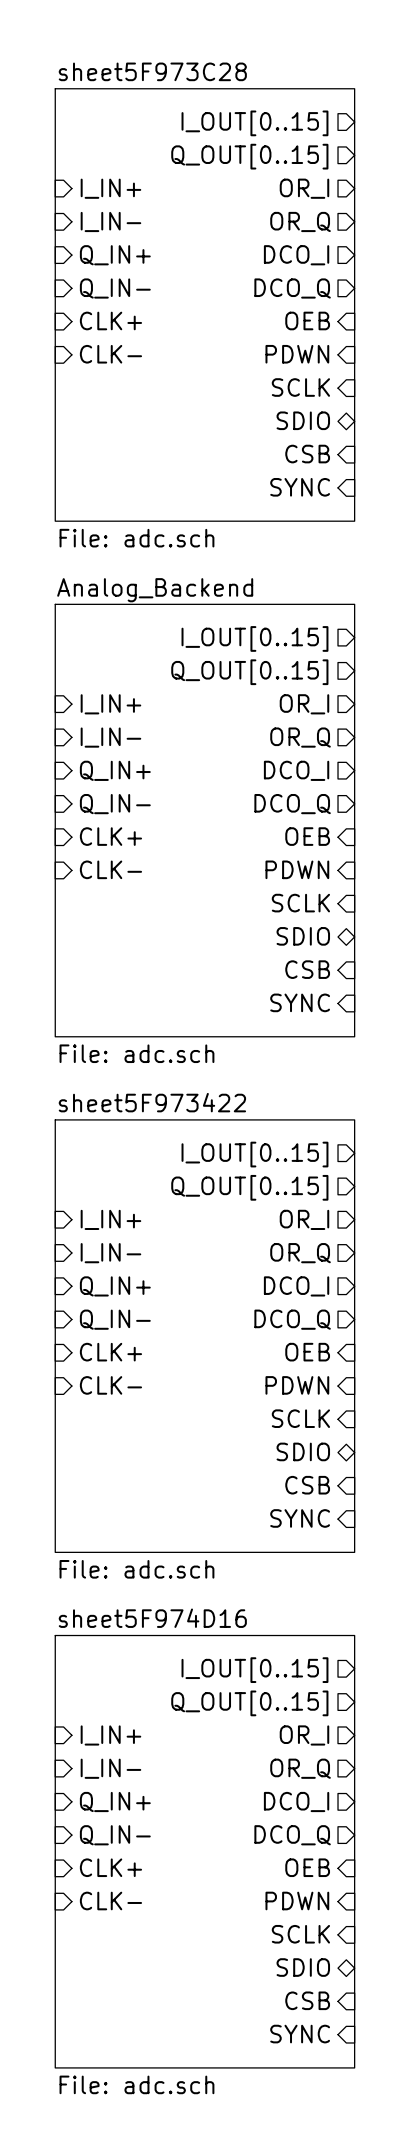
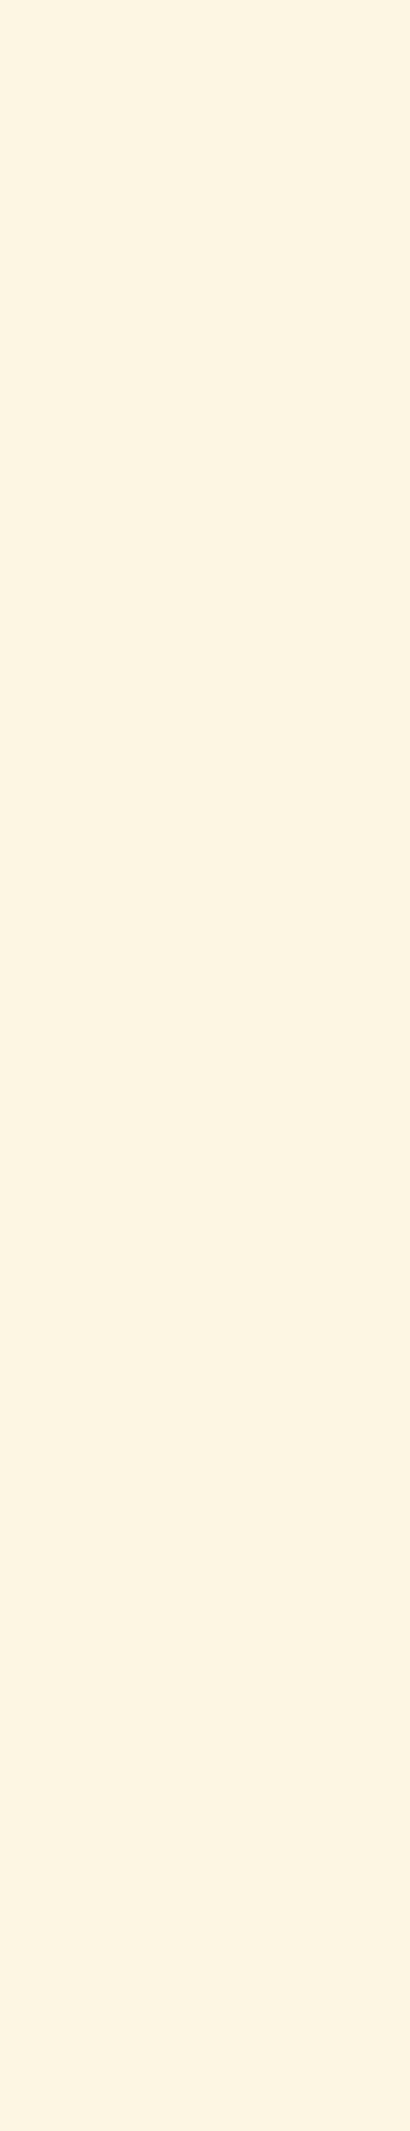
sheet pin: I_OUT[0..15] (254, 123) -> none
sheet pin: Q_OUT[0..15] (249, 156) -> none
sheet pin: I_IN+ (110, 188) -> none
sheet pin: OR_I (304, 188) -> none
sheet pin: I_IN- (110, 221) -> none
sheet pin: OR_Q (300, 221) -> none
sheet pin: Q_IN+ (115, 255) -> none
sheet pin: DCO_I (296, 255) -> none
sheet pin: Q_IN- (115, 288) -> none
sheet pin: DCO_Q (292, 288) -> none
sheet sheet5F973C28: File: adc.sch (204, 304) -> none
sheet pin: CLK+ (110, 320) -> none
sheet pin: OEB (307, 320) -> none
sheet pin: CLK- (110, 354) -> none
sheet pin: PDWN (297, 354) -> none
sheet pin: SCLK (300, 387) -> none
sheet pin: SDIO (303, 420) -> none
sheet pin: CSB (307, 454) -> none
sheet pin: SYNC (300, 487) -> none
sheet pin: I_OUT[0..15] (254, 638) -> none
sheet pin: Q_OUT[0..15] (249, 672) -> none
sheet pin: I_IN+ (110, 704) -> none
sheet pin: OR_I (304, 704) -> none
sheet pin: I_IN- (110, 737) -> none
sheet pin: OR_Q (300, 737) -> none
sheet pin: Q_IN+ (115, 770) -> none
sheet pin: DCO_I (296, 770) -> none
sheet pin: Q_IN- (115, 804) -> none
sheet pin: DCO_Q (292, 804) -> none
sheet Analog_Backend: File: adc.sch (204, 820) -> none
sheet pin: CLK+ (110, 836) -> none
sheet pin: OEB (307, 836) -> none
sheet pin: CLK- (110, 869) -> none
sheet pin: PDWN (297, 869) -> none
sheet pin: SCLK (300, 903) -> none
sheet pin: SDIO (303, 936) -> none
sheet pin: CSB (307, 969) -> none
sheet pin: SYNC (300, 1002) -> none
sheet pin: I_OUT[0..15] (254, 1154) -> none
sheet pin: Q_OUT[0..15] (249, 1187) -> none
sheet pin: I_IN+ (110, 1219) -> none
sheet pin: OR_I (304, 1219) -> none
sheet pin: I_IN- (110, 1253) -> none
sheet pin: OR_Q (300, 1253) -> none
sheet pin: Q_IN+ (115, 1286) -> none
sheet pin: DCO_I (296, 1286) -> none
sheet pin: Q_IN- (115, 1319) -> none
sheet pin: DCO_Q (292, 1319) -> none
sheet sheet5F973422: File: adc.sch (204, 1336) -> none
sheet pin: CLK+ (110, 1352) -> none
sheet pin: OEB (307, 1352) -> none
sheet pin: CLK- (110, 1385) -> none
sheet pin: PDWN (297, 1385) -> none
sheet pin: SCLK (300, 1418) -> none
sheet pin: SDIO (303, 1451) -> none
sheet pin: CSB (307, 1485) -> none
sheet pin: SYNC (300, 1518) -> none
sheet pin: I_OUT[0..15] (254, 1670) -> none
sheet pin: Q_OUT[0..15] (249, 1703) -> none
sheet pin: I_IN+ (110, 1735) -> none
sheet pin: OR_I (304, 1735) -> none
sheet pin: I_IN- (110, 1768) -> none
sheet pin: OR_Q (300, 1768) -> none
sheet pin: Q_IN+ (115, 1802) -> none
sheet pin: DCO_I (296, 1802) -> none
sheet pin: Q_IN- (115, 1835) -> none
sheet pin: DCO_Q (292, 1835) -> none
sheet sheet5F974D16: File: adc.sch (204, 1851) -> none
sheet pin: CLK+ (110, 1867) -> none
sheet pin: OEB (307, 1867) -> none
sheet pin: CLK- (110, 1901) -> none
sheet pin: PDWN (297, 1901) -> none
sheet pin: SCLK (300, 1934) -> none
sheet pin: SDIO (303, 1967) -> none
sheet pin: CSB (307, 2000) -> none
sheet pin: SYNC (300, 2034) -> none

